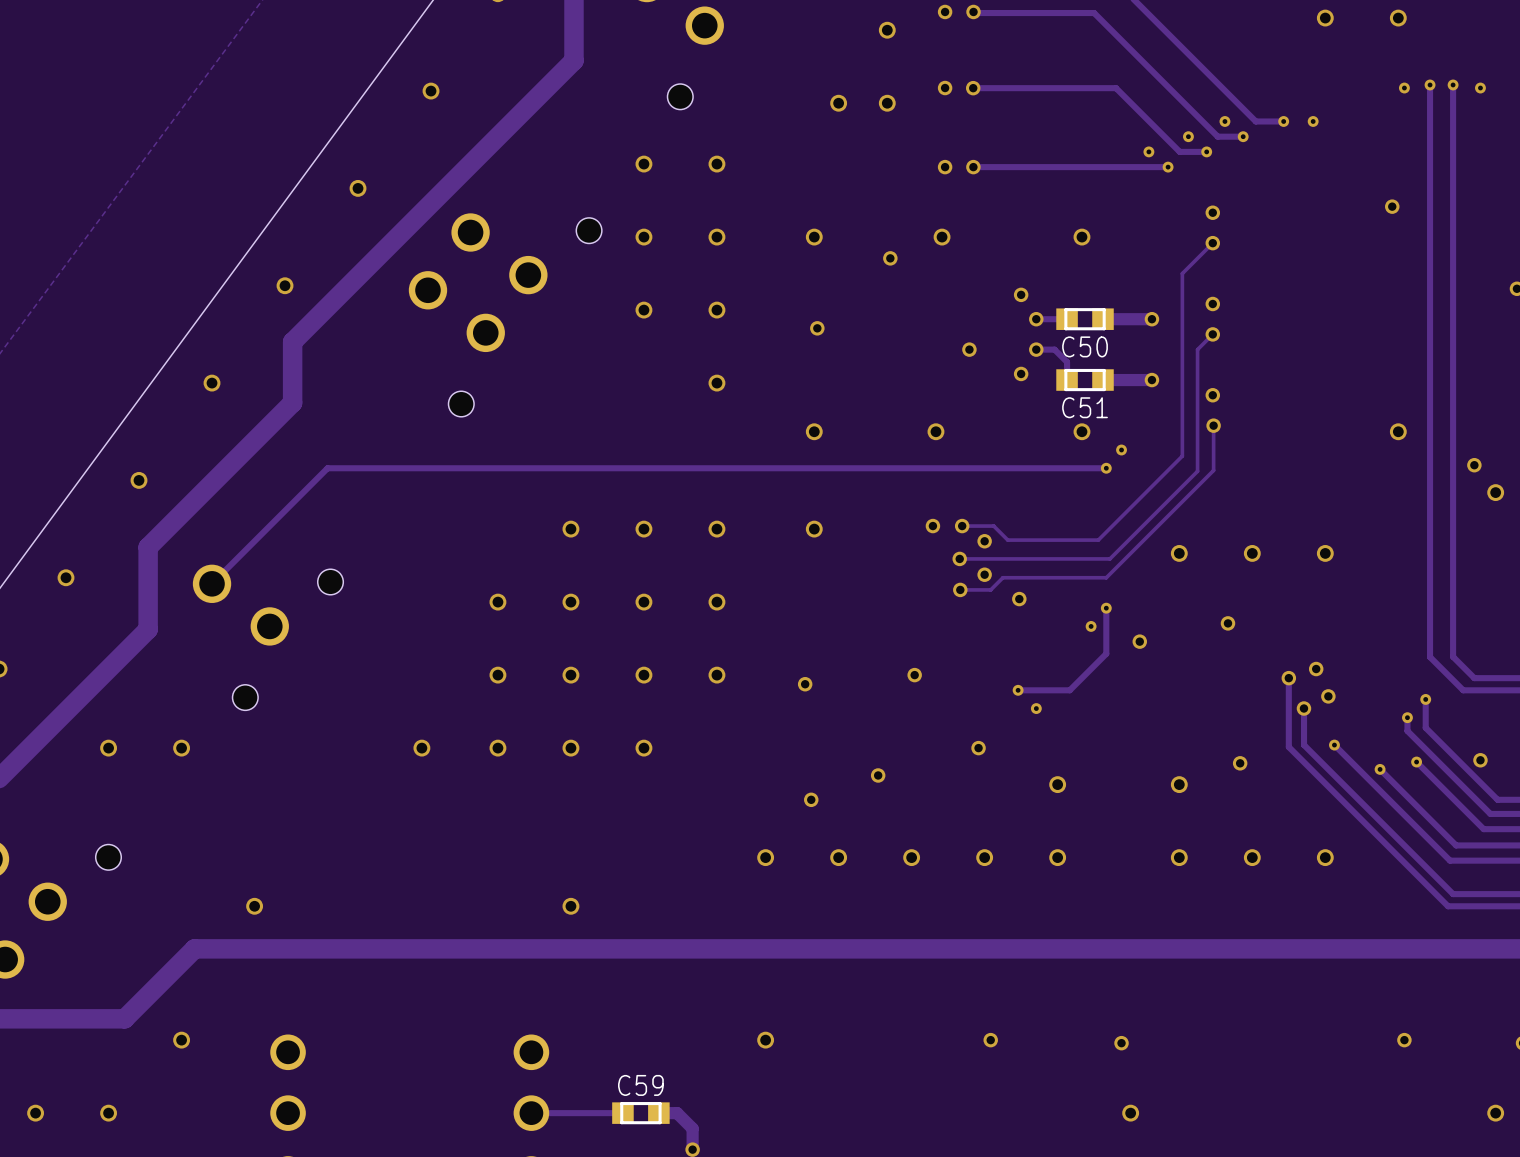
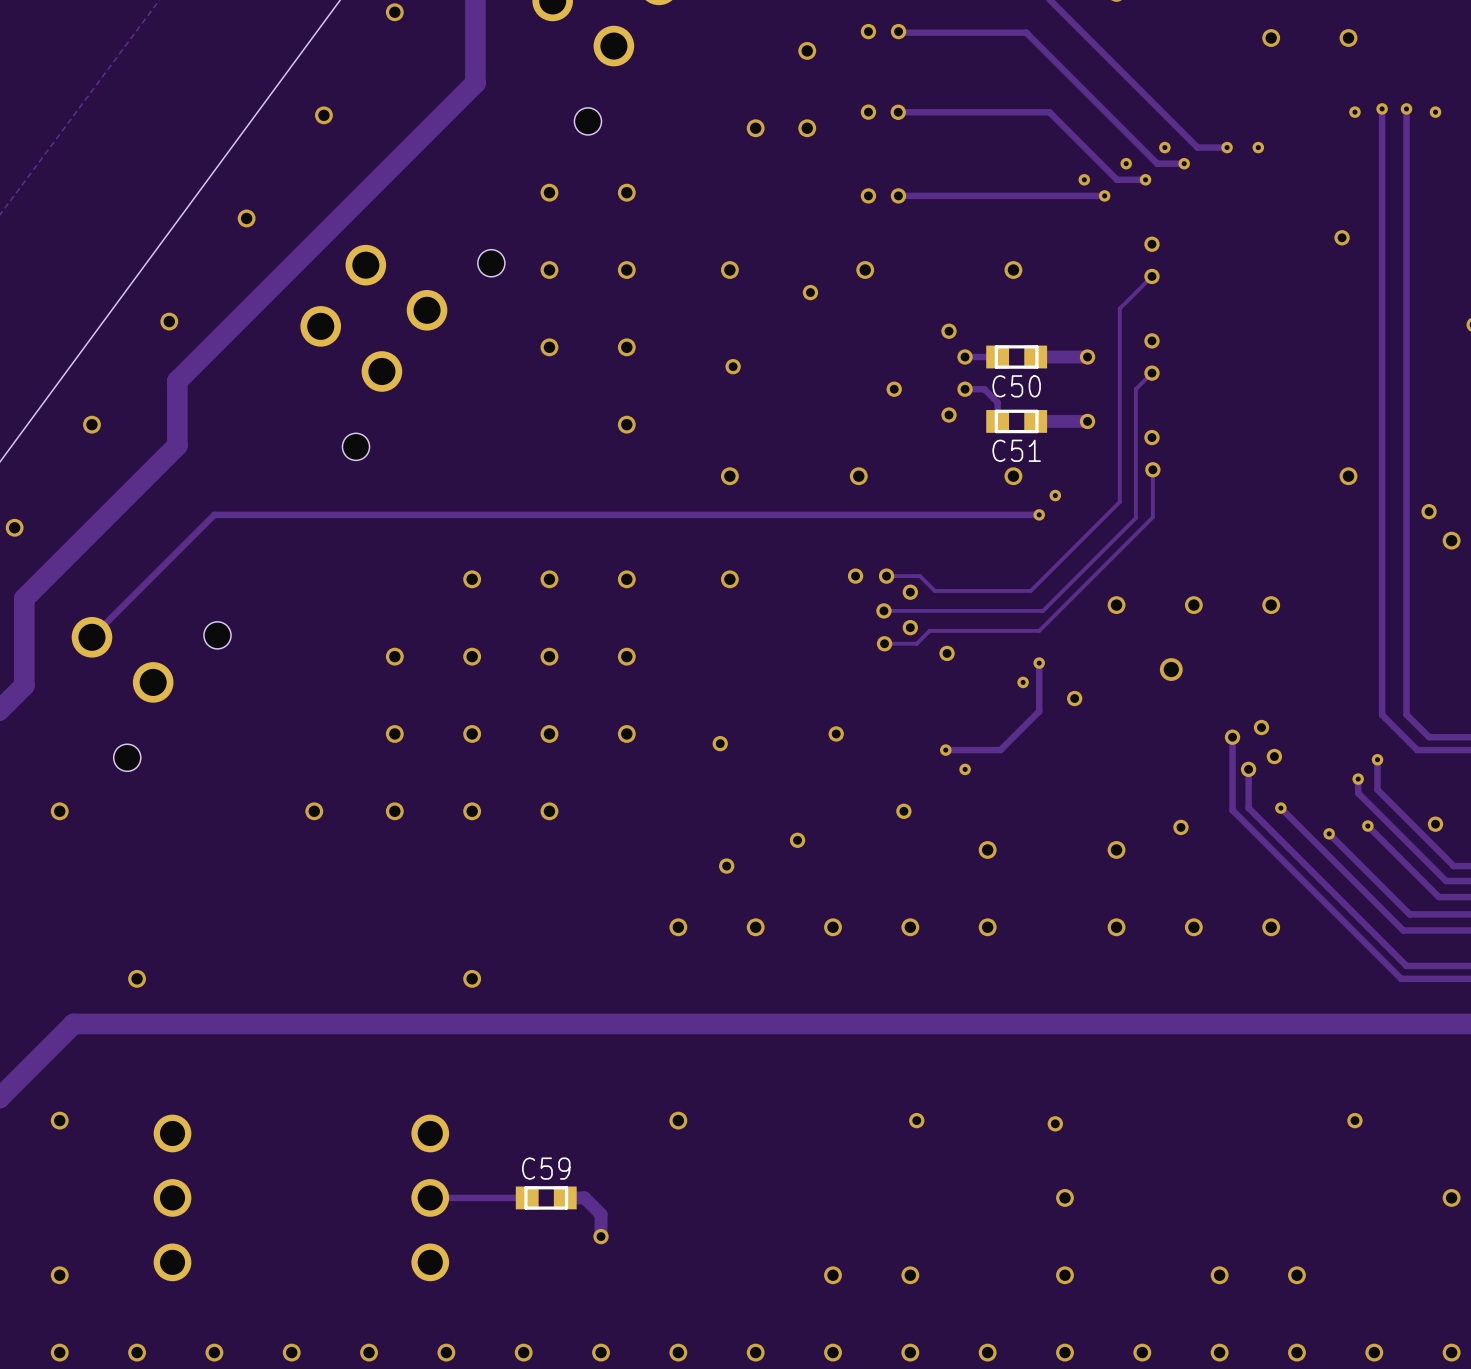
via size: [1220, 616, 1236, 631] -> [1159, 658, 1183, 681]

